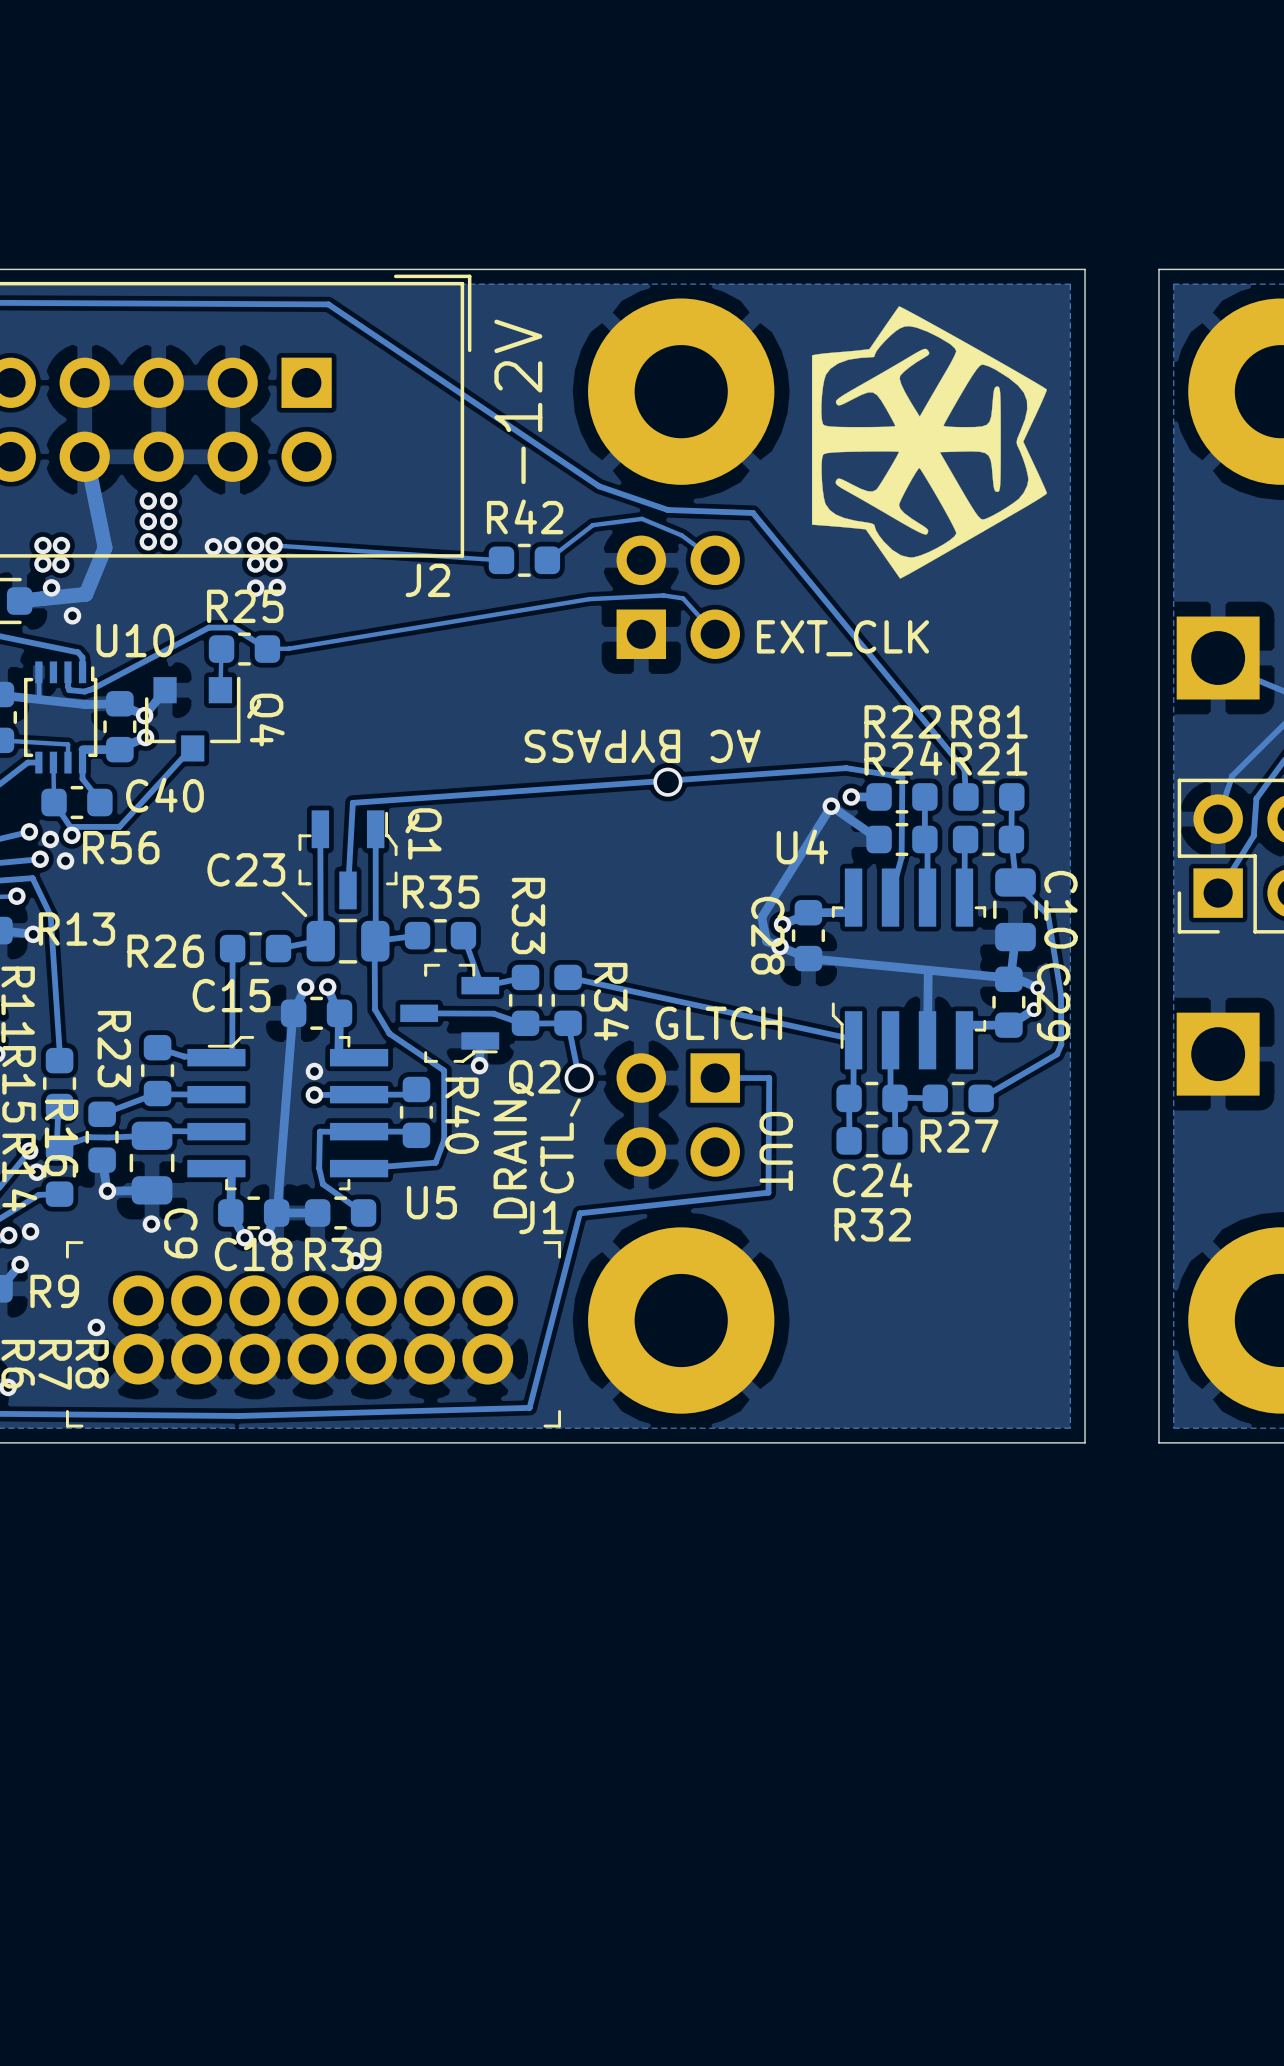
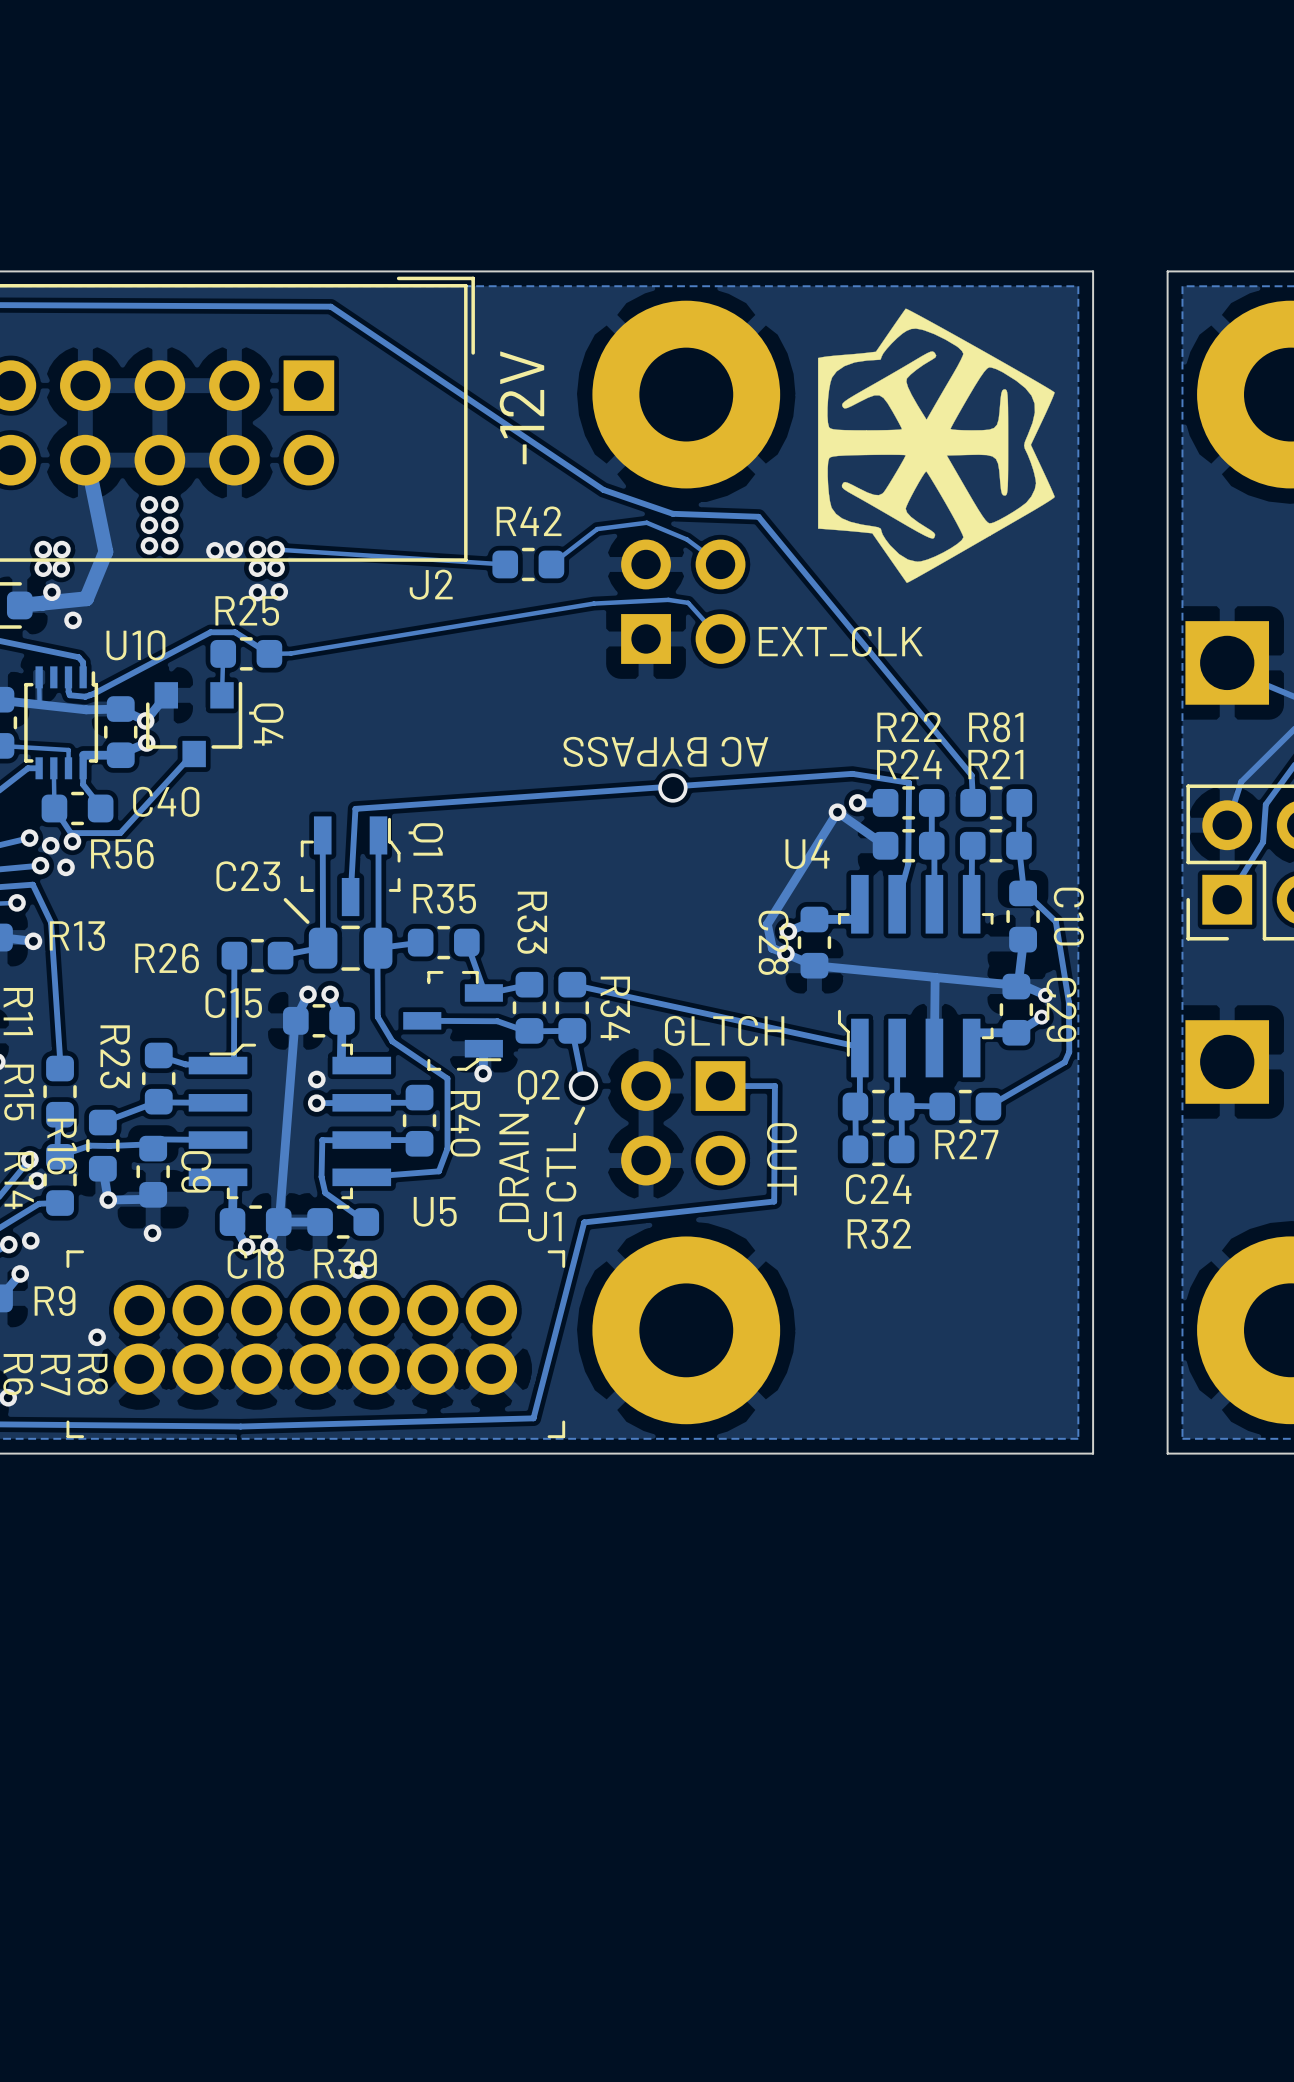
C10 footprint: [993, 868, 1038, 952] -> [1006, 880, 1040, 953]
C9 footprint: [129, 1121, 175, 1205] -> [136, 1135, 170, 1208]
C9 name position: C9 (180, 1233) -> C9 (196, 1171)

